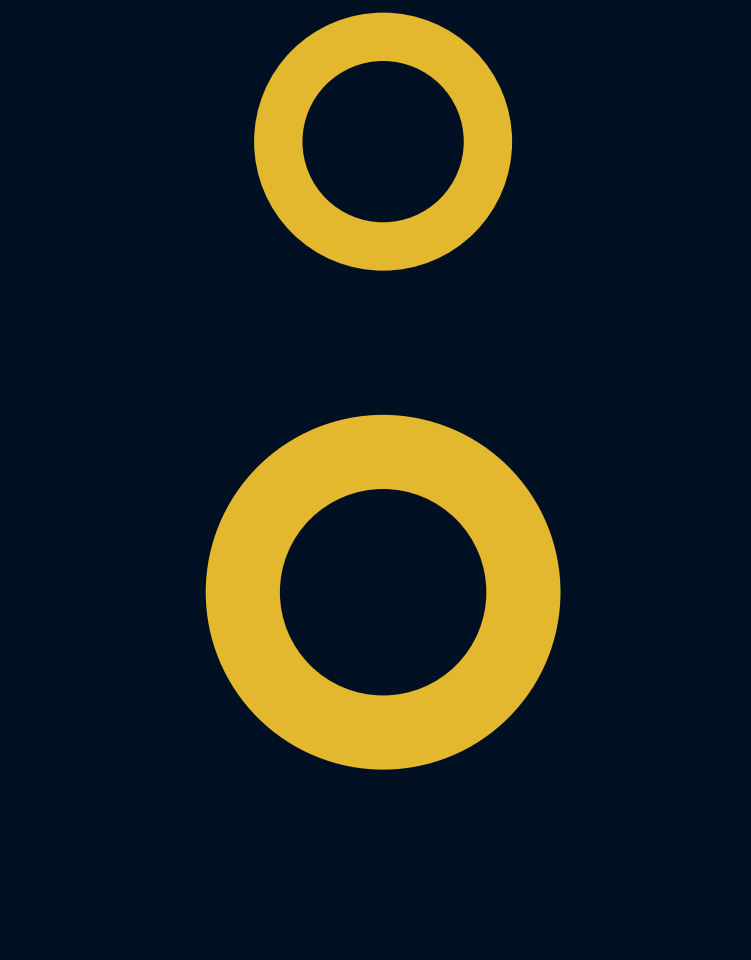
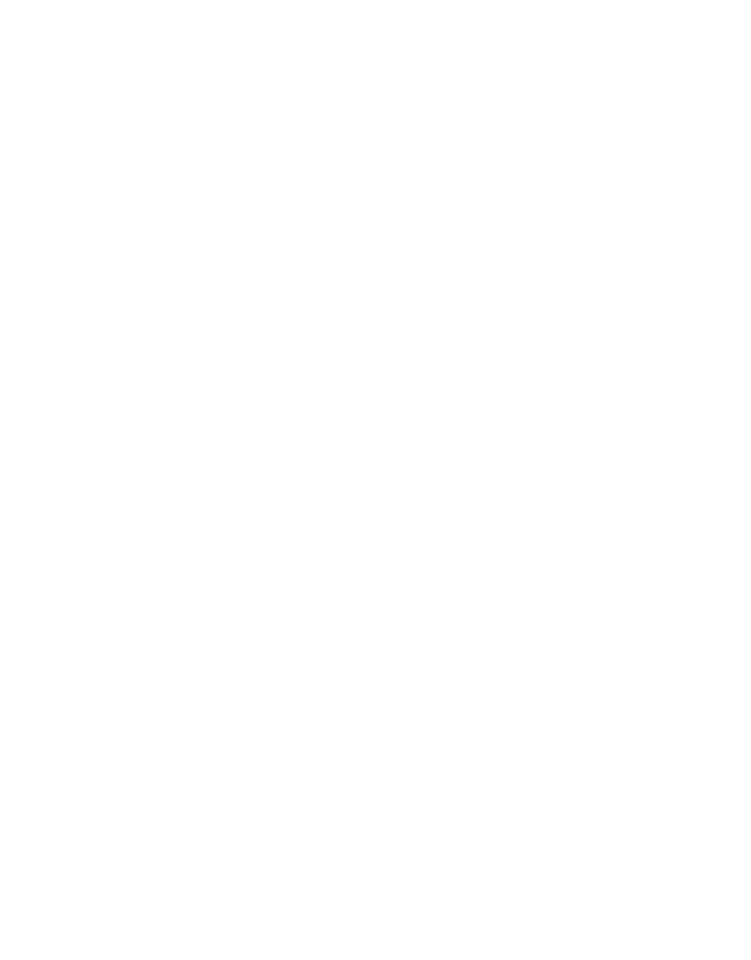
part: (383, 141) -> none
part: (383, 592) -> none

